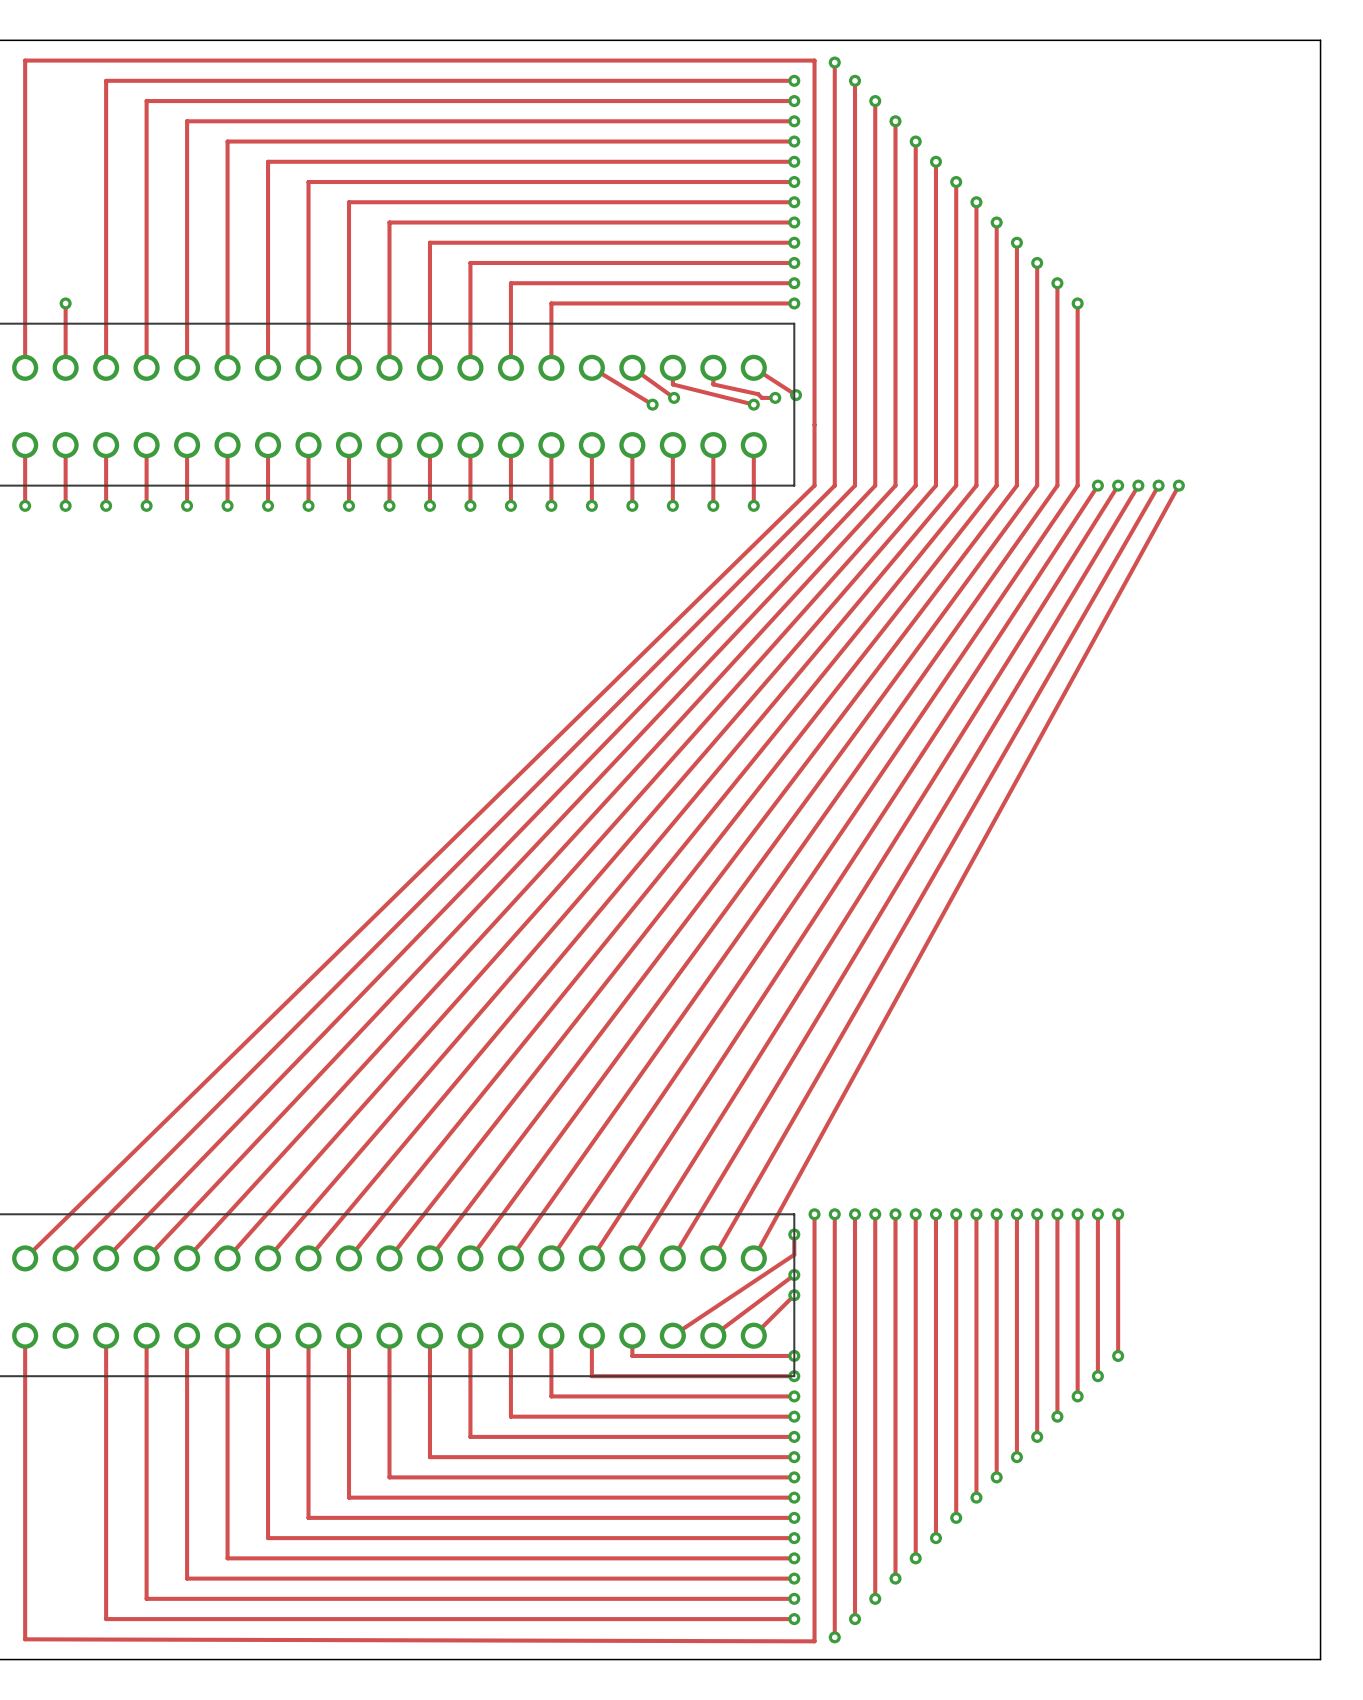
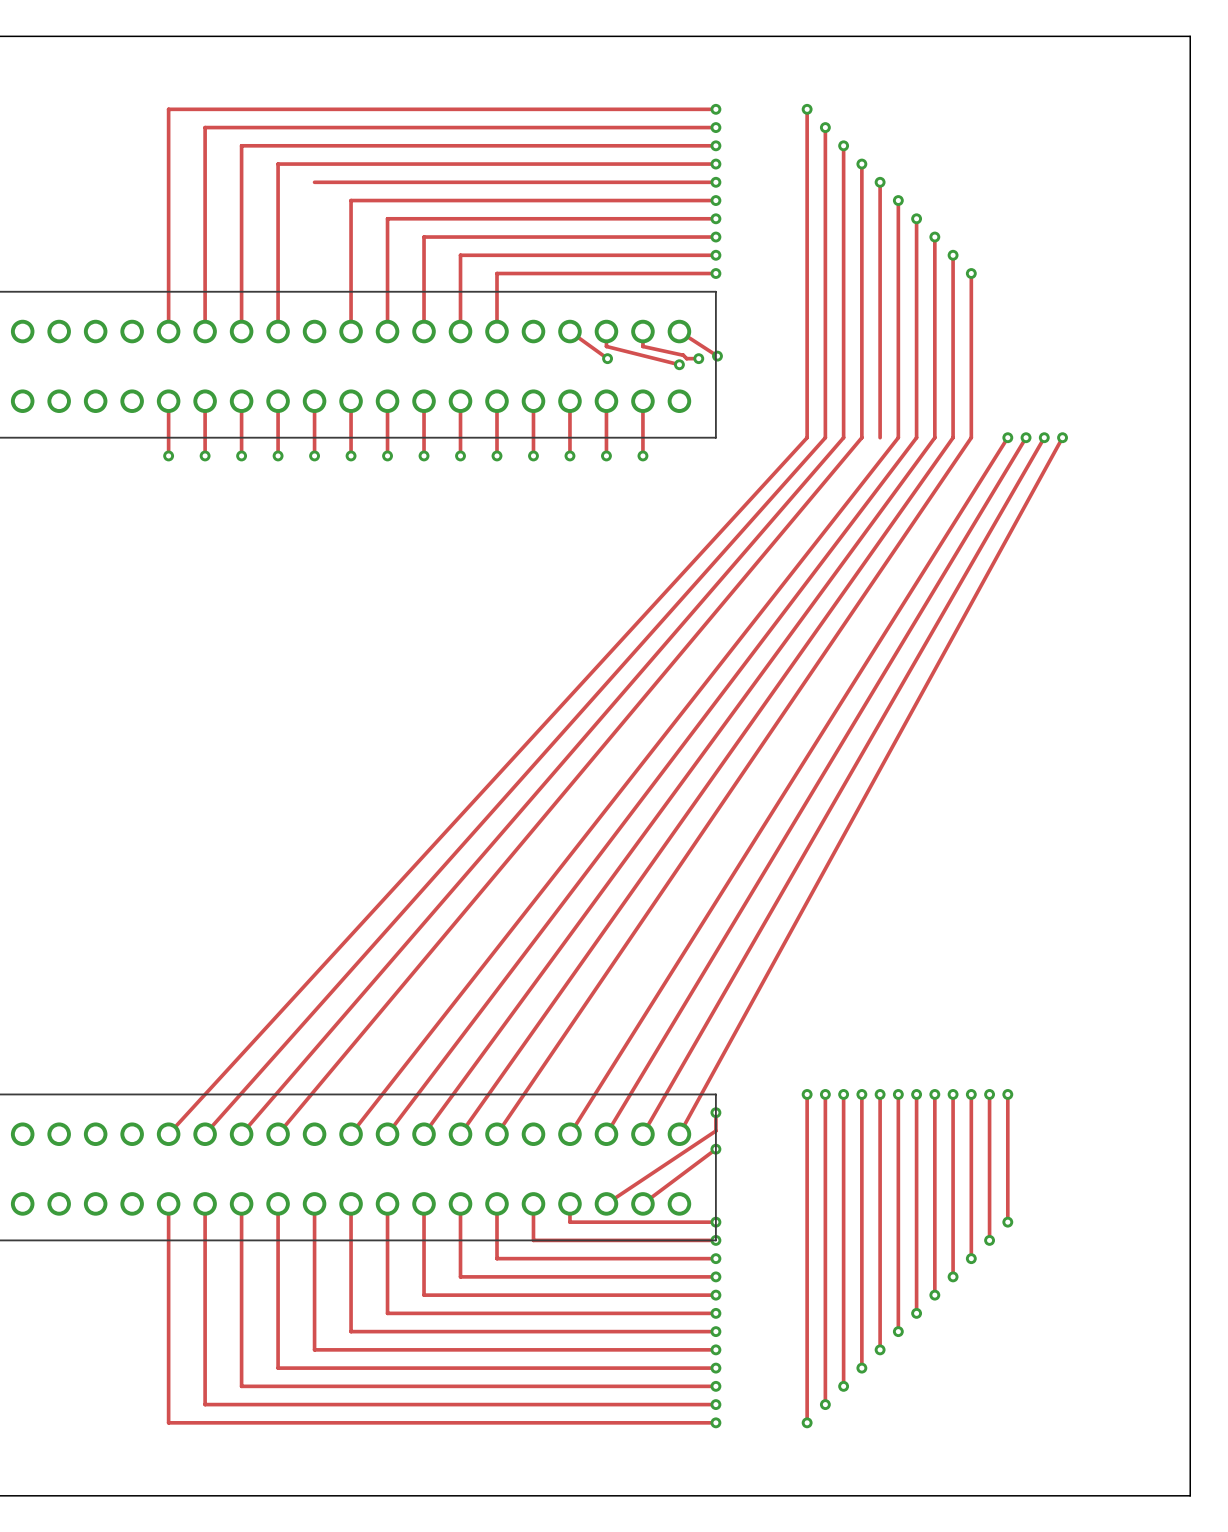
track: (834, 60) (834, 485) (65, 1258) -> none
via: (834, 62) -> none
track: (794, 80) (106, 80) (106, 367) -> none
via: (794, 80) -> none
track: (855, 80) (855, 485) (106, 1258) -> none
via: (855, 80) -> none
track: (794, 101) (146, 101) (146, 367) -> none
via: (794, 101) -> none
track: (875, 101) (875, 485) (146, 1258) -> none
via: (875, 101) -> none
track: (349, 202) (349, 367) -> none
track: (65, 303) (65, 367) -> none
via: (65, 303) -> none
track: (25, 367) (25, 60) (814, 60) (814, 485) (25, 1258) -> none
track: (591, 367) (652, 404) -> none
via: (652, 404) -> none
track: (25, 445) (25, 505) -> none
track: (65, 445) (65, 505) -> none
track: (106, 445) (106, 505) -> none
track: (146, 445) (146, 505) -> none
track: (753, 445) (753, 505) -> none
track: (976, 485) (349, 1258) -> none
track: (1097, 485) (591, 1258) -> none
via: (1097, 485) -> none
via: (25, 505) -> none
via: (65, 505) -> none
via: (106, 505) -> none
via: (146, 505) -> none
via: (753, 505) -> none
track: (814, 1214) (814, 1641) (25, 1639) (25, 1335) -> none
via: (814, 1214) -> none
track: (834, 1214) (834, 1639) -> none
via: (834, 1214) -> none
track: (855, 1214) (855, 1619) -> none
via: (855, 1214) -> none
track: (875, 1214) (875, 1598) -> none
via: (875, 1214) -> none
track: (794, 1295) (753, 1335) -> none
via: (794, 1295) -> none
track: (106, 1335) (106, 1619) (794, 1619) -> none
track: (146, 1335) (146, 1598) (794, 1598) -> none
via: (794, 1598) -> none
via: (875, 1598) -> none
via: (794, 1619) -> none
via: (855, 1619) -> none
via: (834, 1637) -> none

